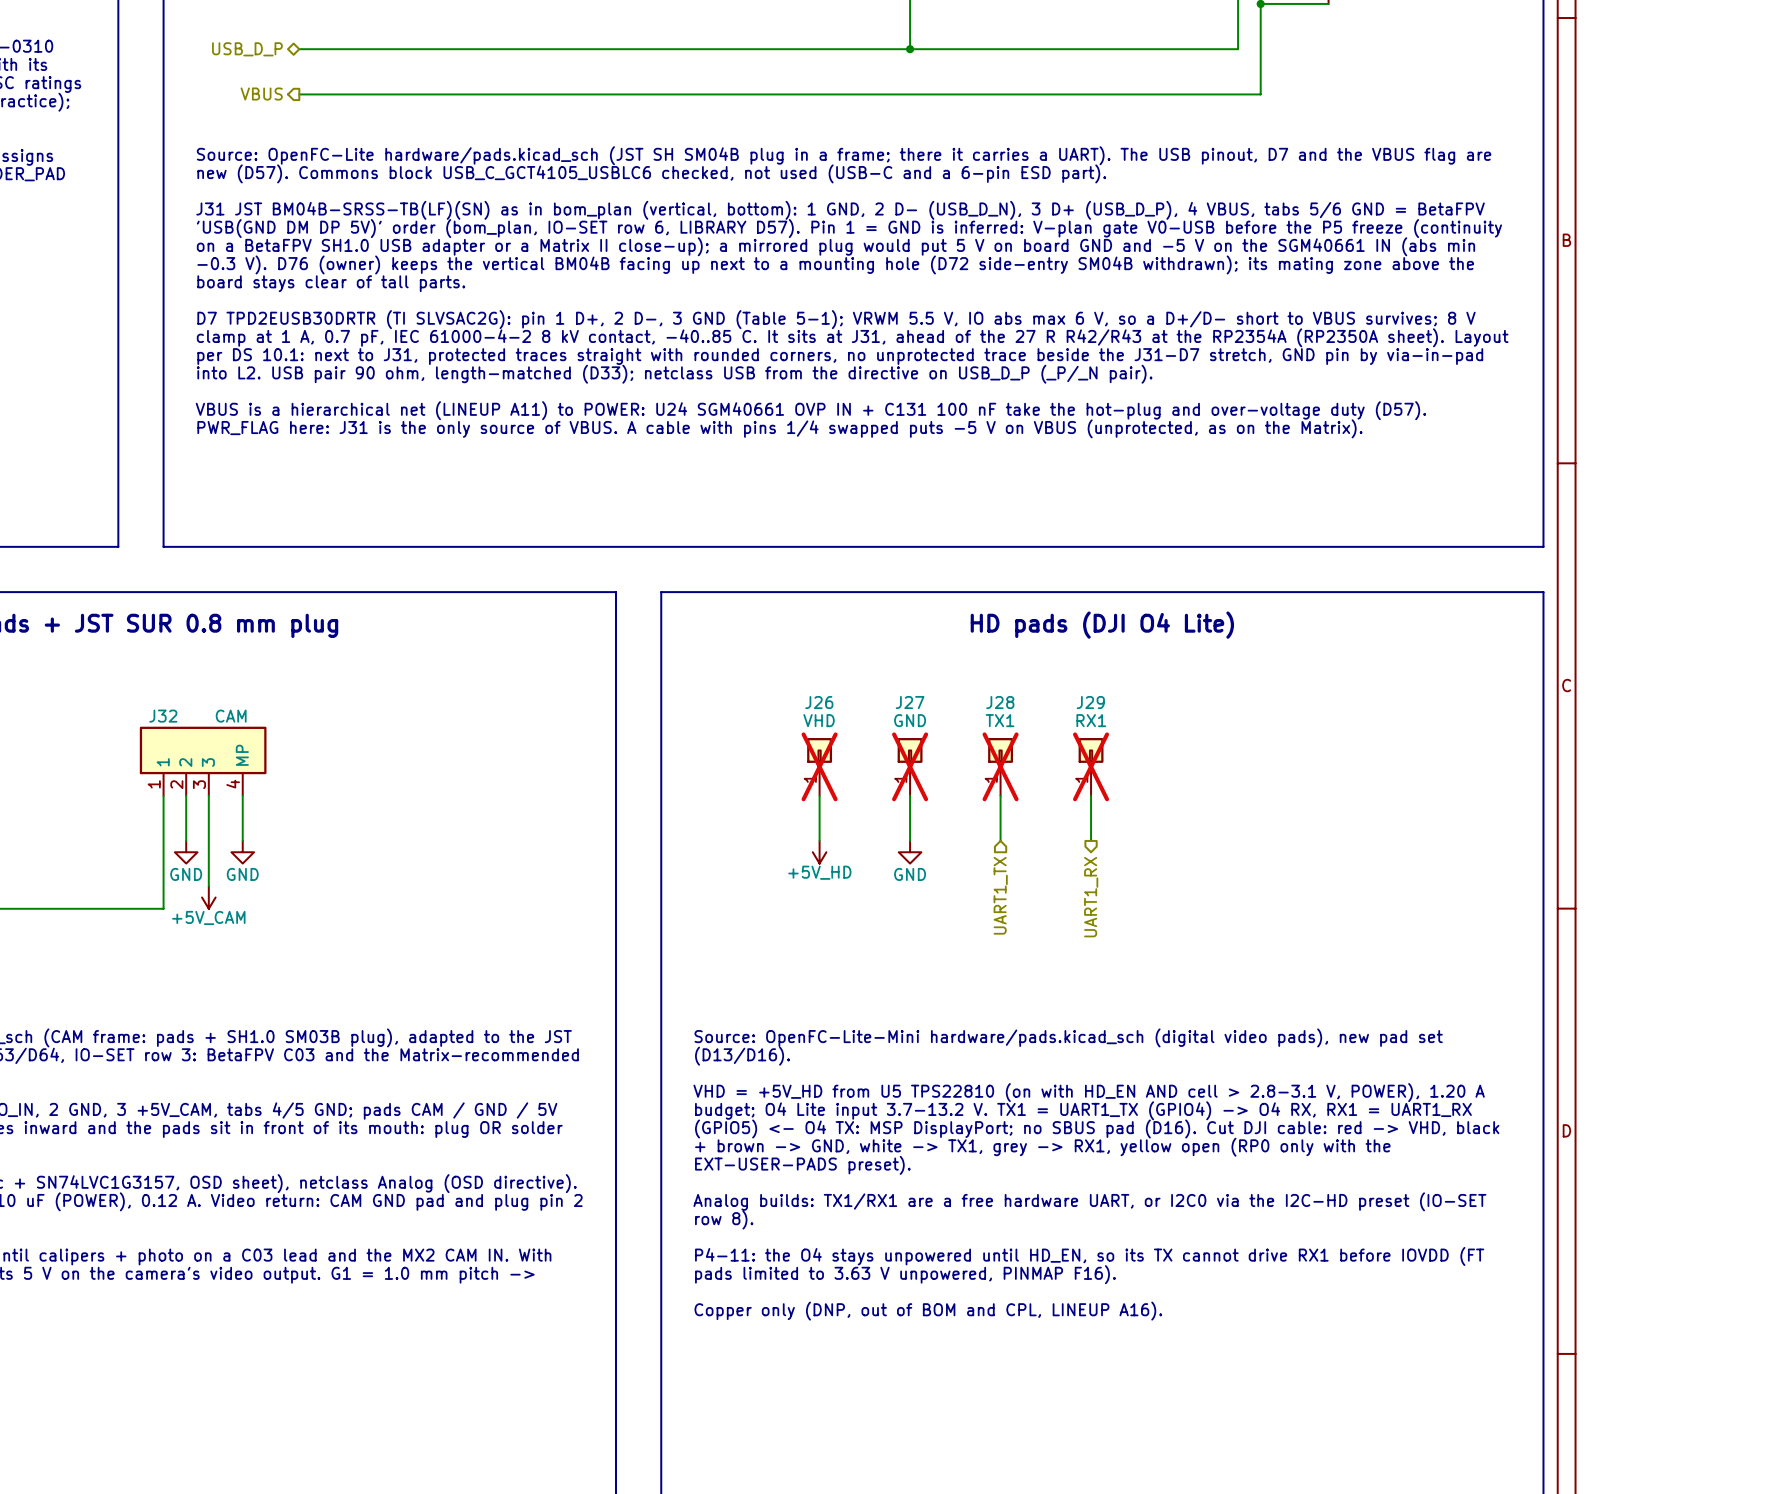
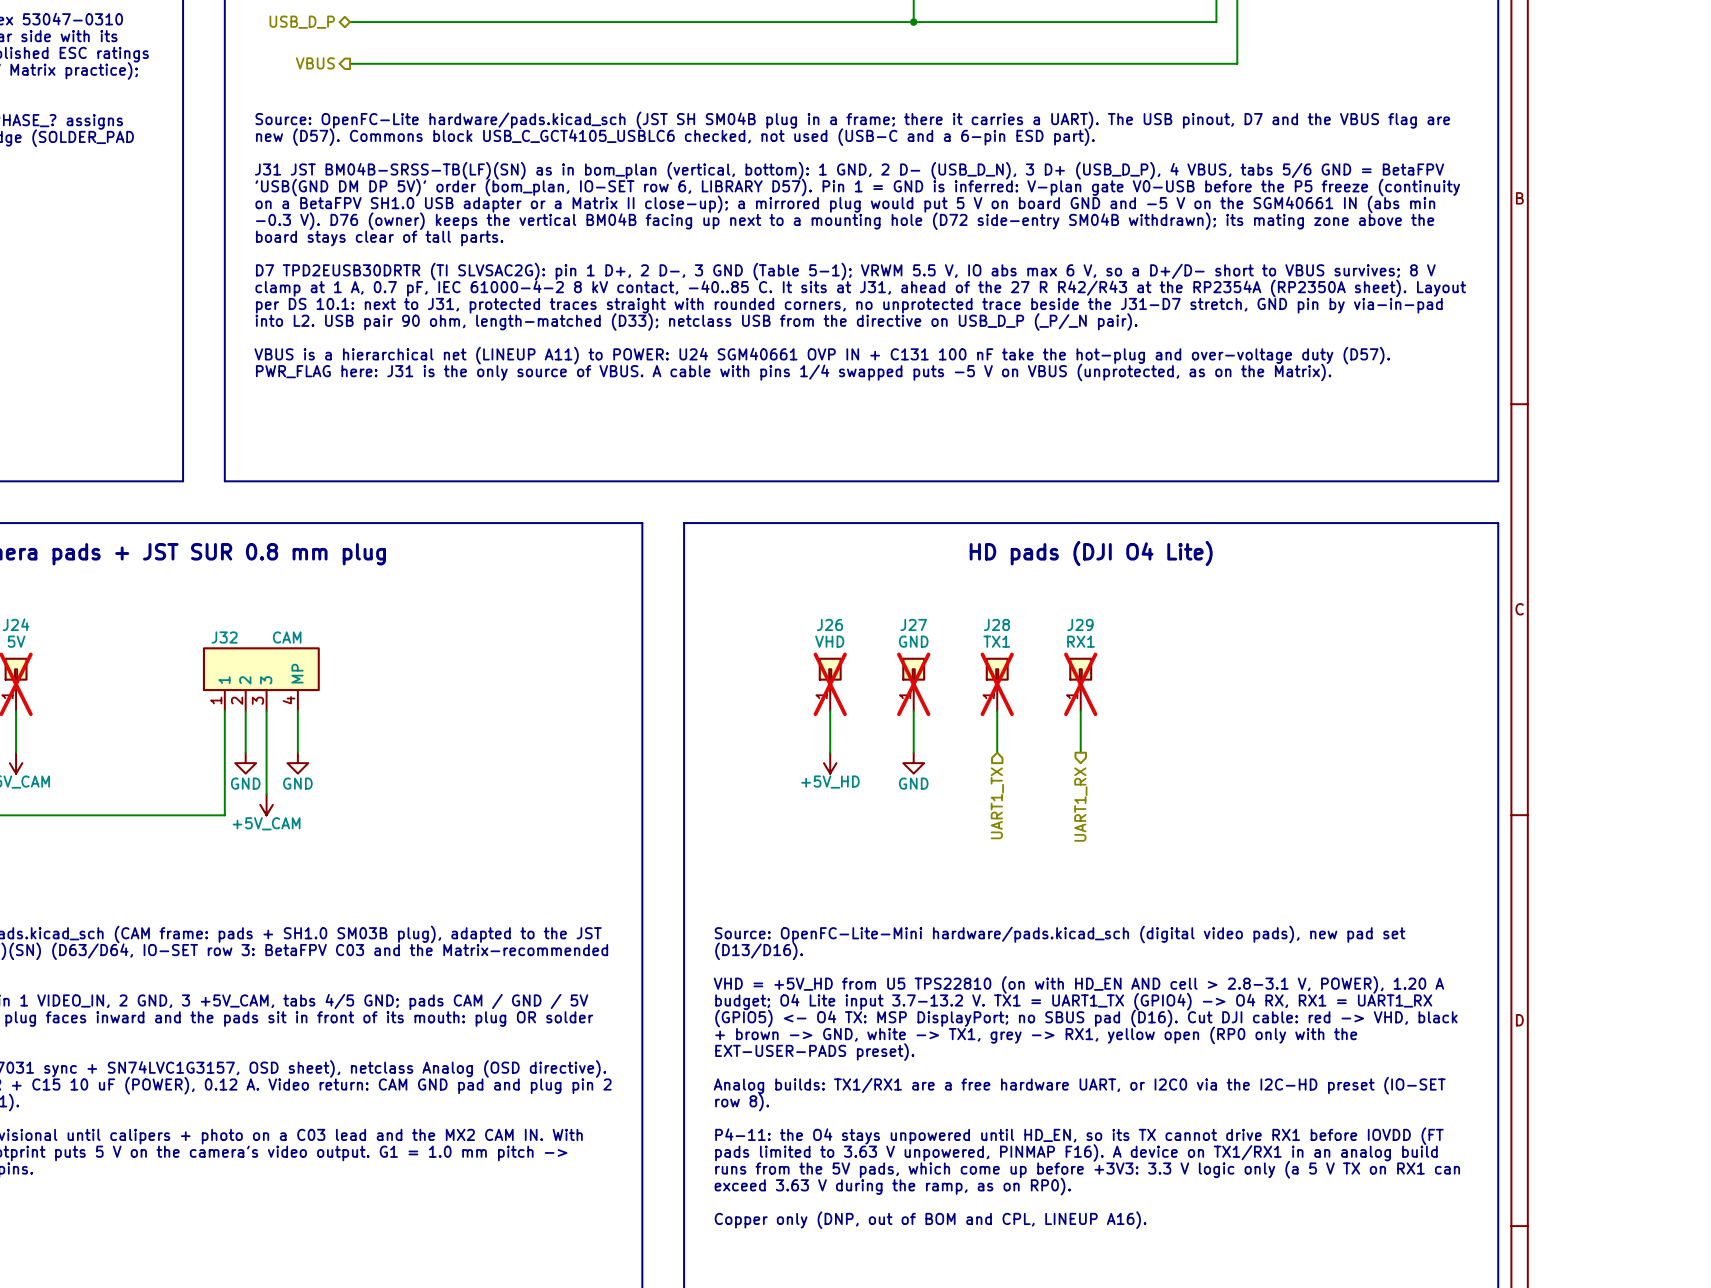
text: pads limited to 3.63 V unpowered, PINMAP F16). (905, 1274) -> pads limited to 3.63 V unpowered, PINMAP F16). A device on TX1/RX1 in an analog build (1076, 1152)
text: none -> runs from the 5V pads, which come up before +3V3: 3.3 V logic only (a 5 V TX on RX1 can (1087, 1169)
text: Copper only (DNP, out of BOM and CPL, LINEUP A16). (928, 1311) -> exceed 3.63 V during the ramp, as on RP0). (892, 1186)
text: none -> Copper only (DNP, out of BOM and CPL, LINEUP A16). (930, 1220)

